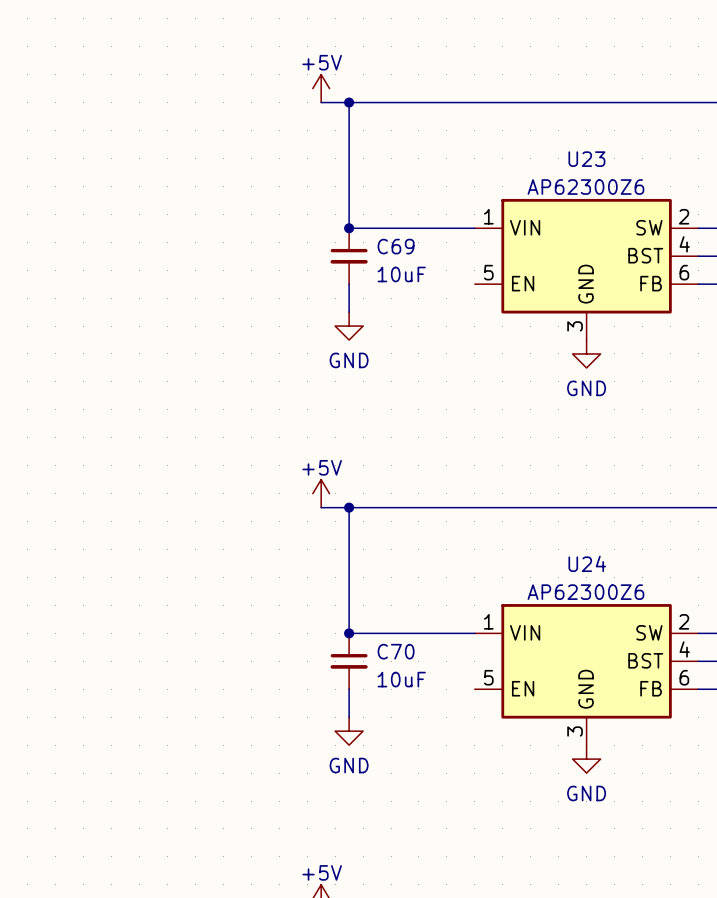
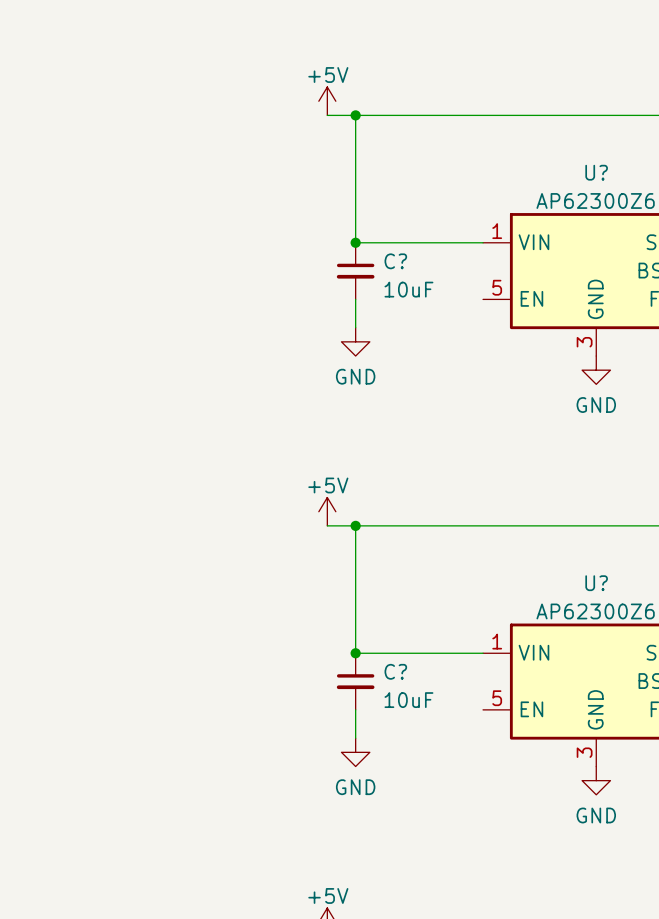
U23 name: U23 (586, 159) -> U? (596, 172)
C69 name: C69 (396, 246) -> C? (395, 261)
U24 name: U24 (587, 563) -> U? (596, 583)
C70 name: C70 (396, 651) -> C? (395, 671)

